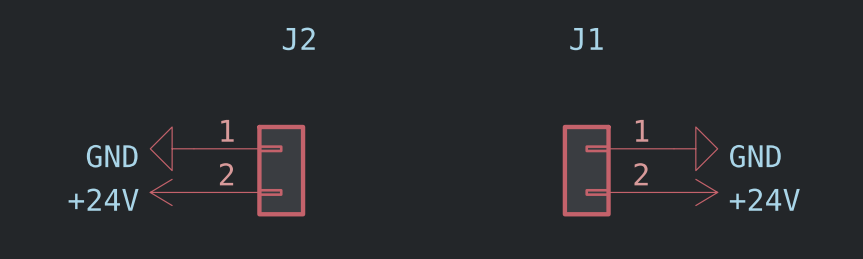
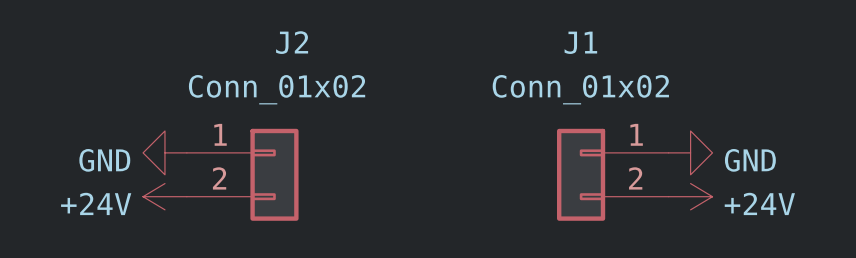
J2 value: none -> Conn_01x02 (277, 89)
J1 value: none -> Conn_01x02 (580, 89)

